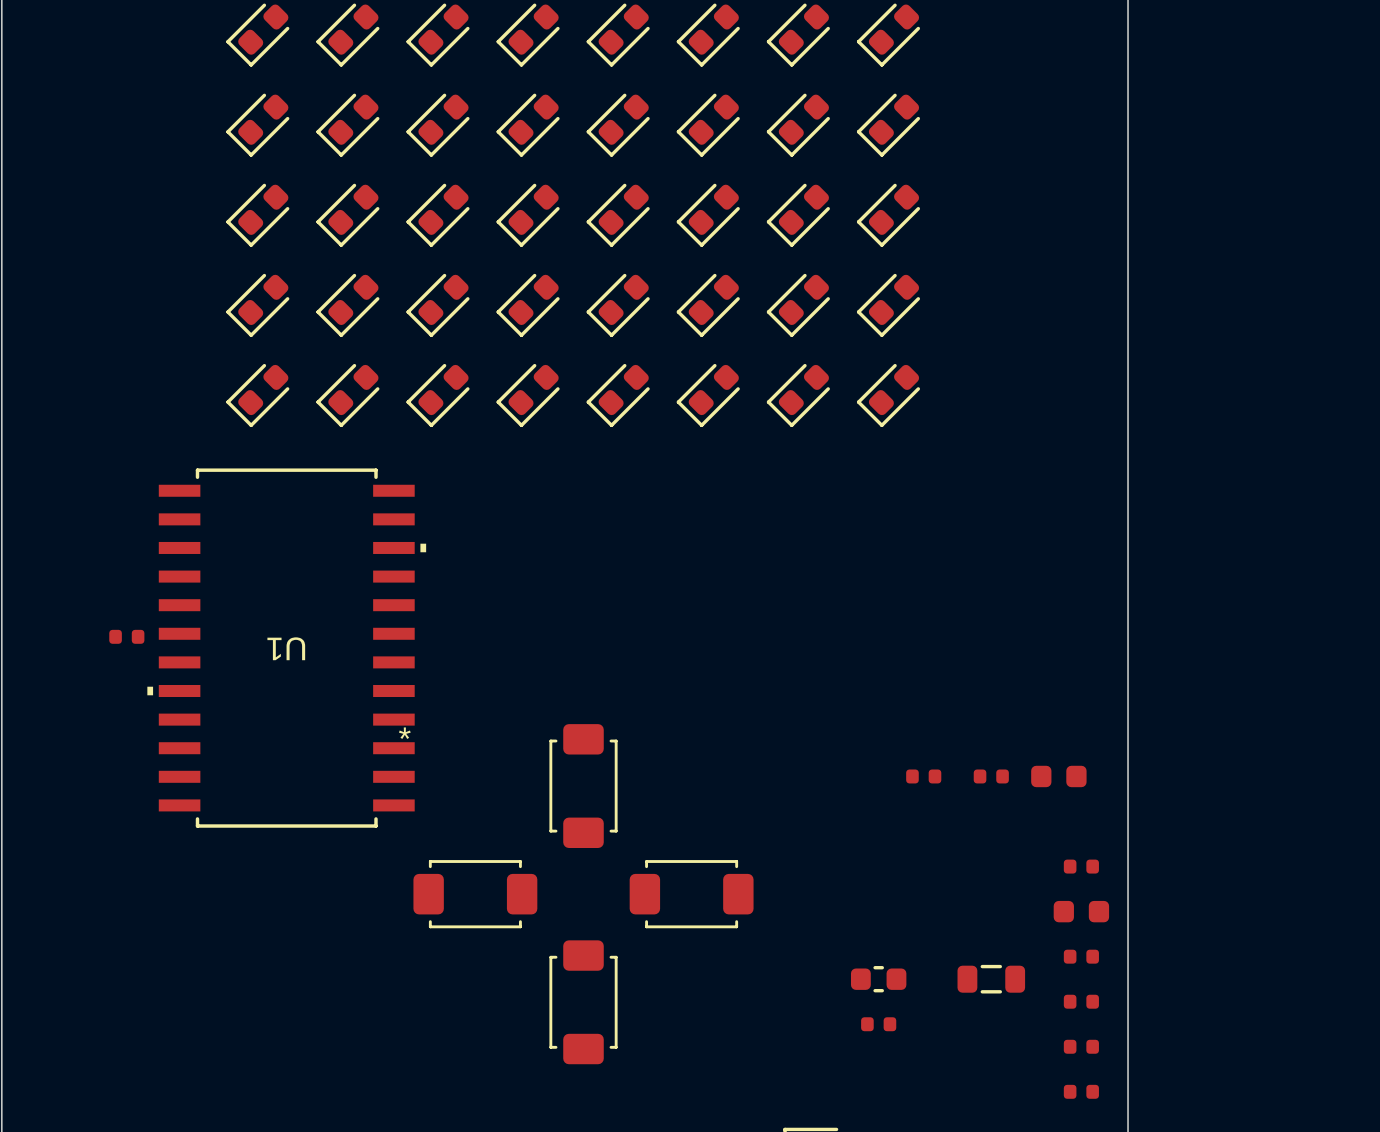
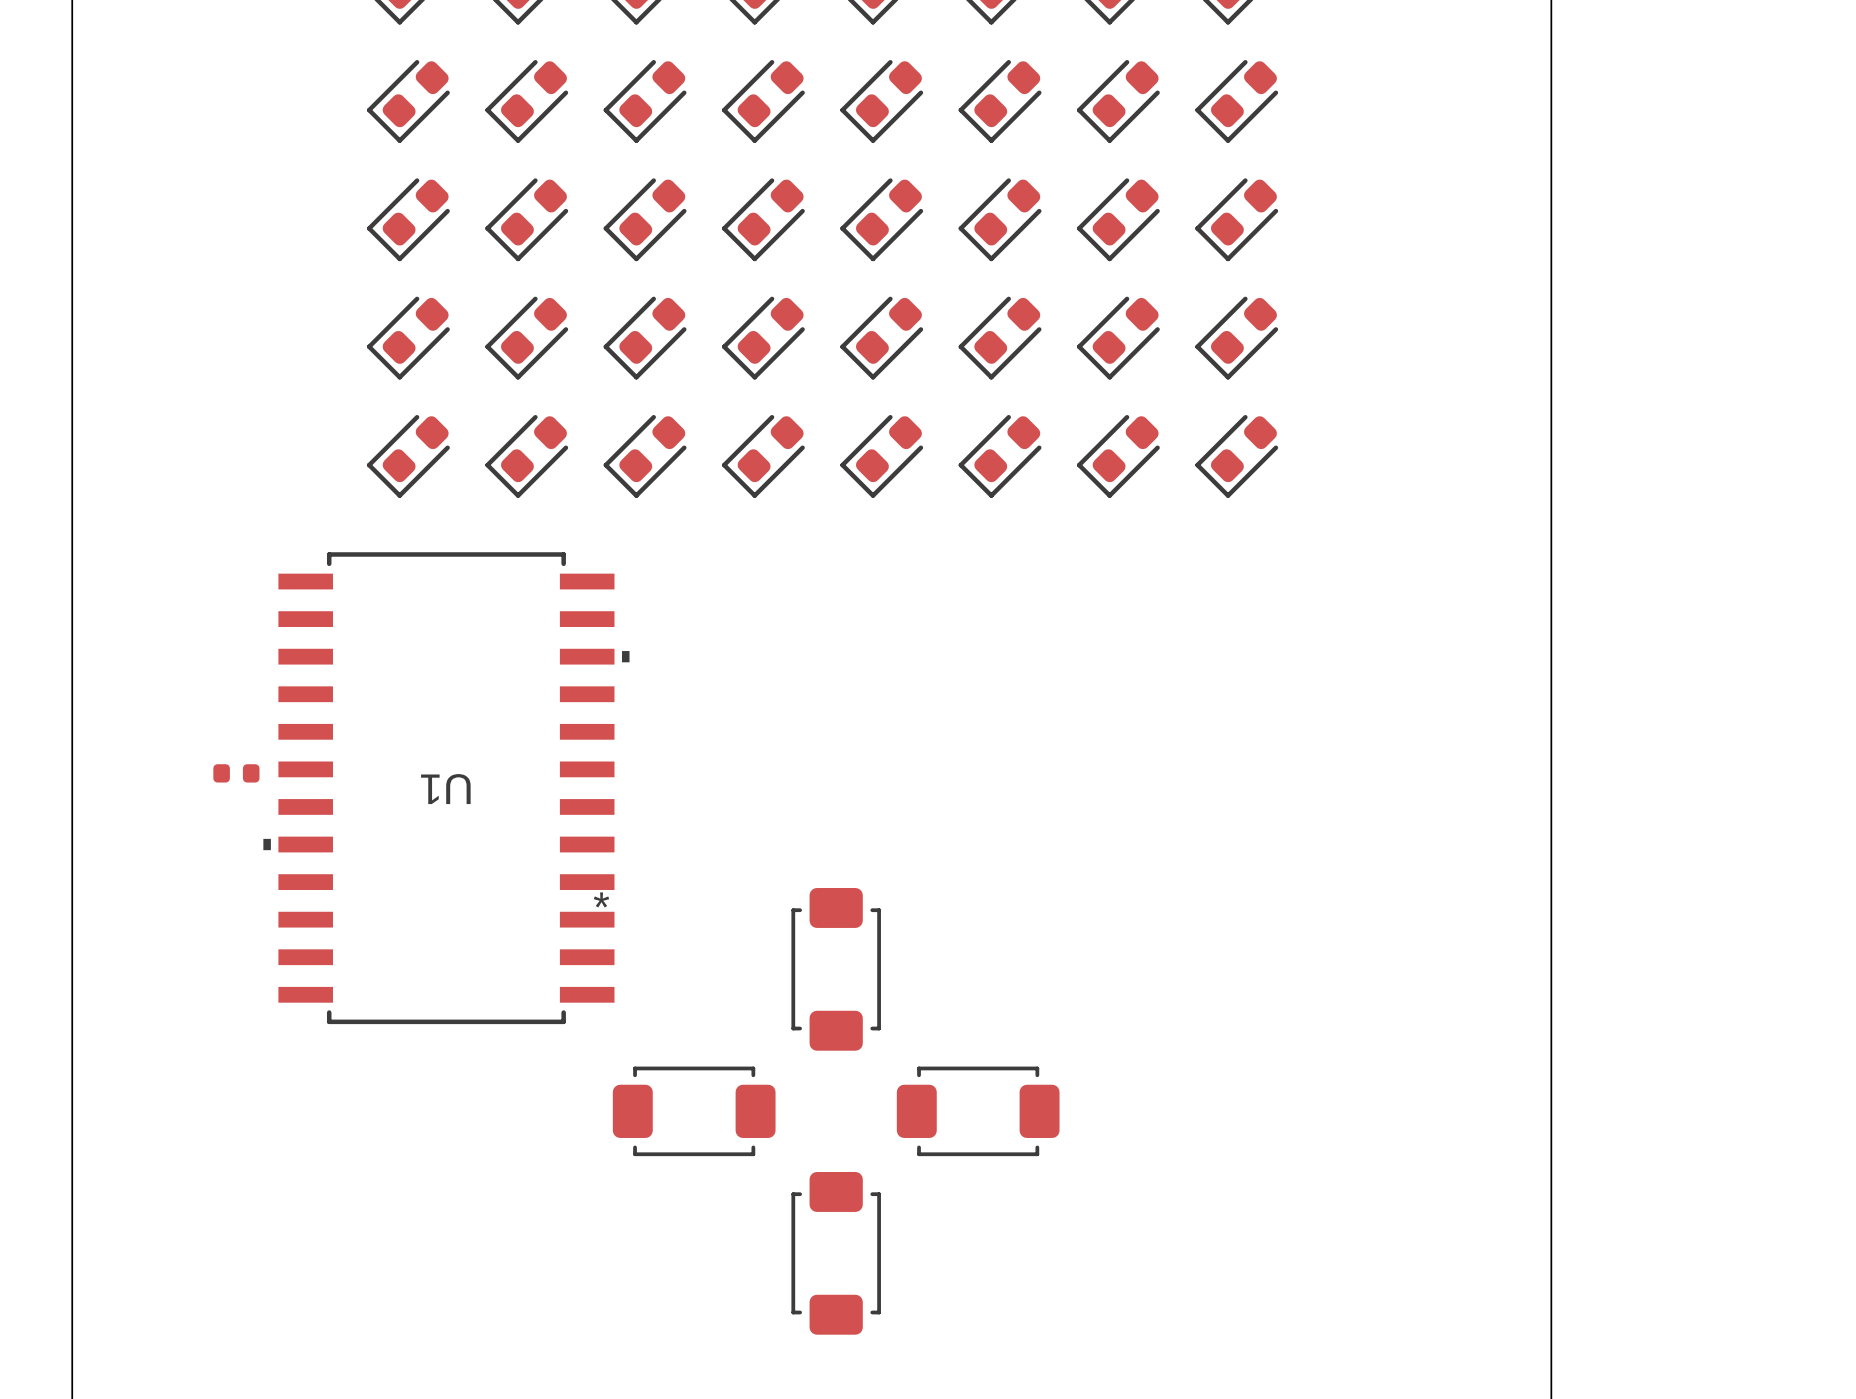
part: (923, 776) -> none
part: (991, 776) -> none
part: (1058, 776) -> none
part: (1081, 866) -> none
part: (1081, 911) -> none
part: (1081, 956) -> none
part: (878, 979) -> none
part: (991, 979) -> none
part: (1081, 1001) -> none
part: (878, 1024) -> none
part: (1081, 1046) -> none
part: (1081, 1091) -> none

